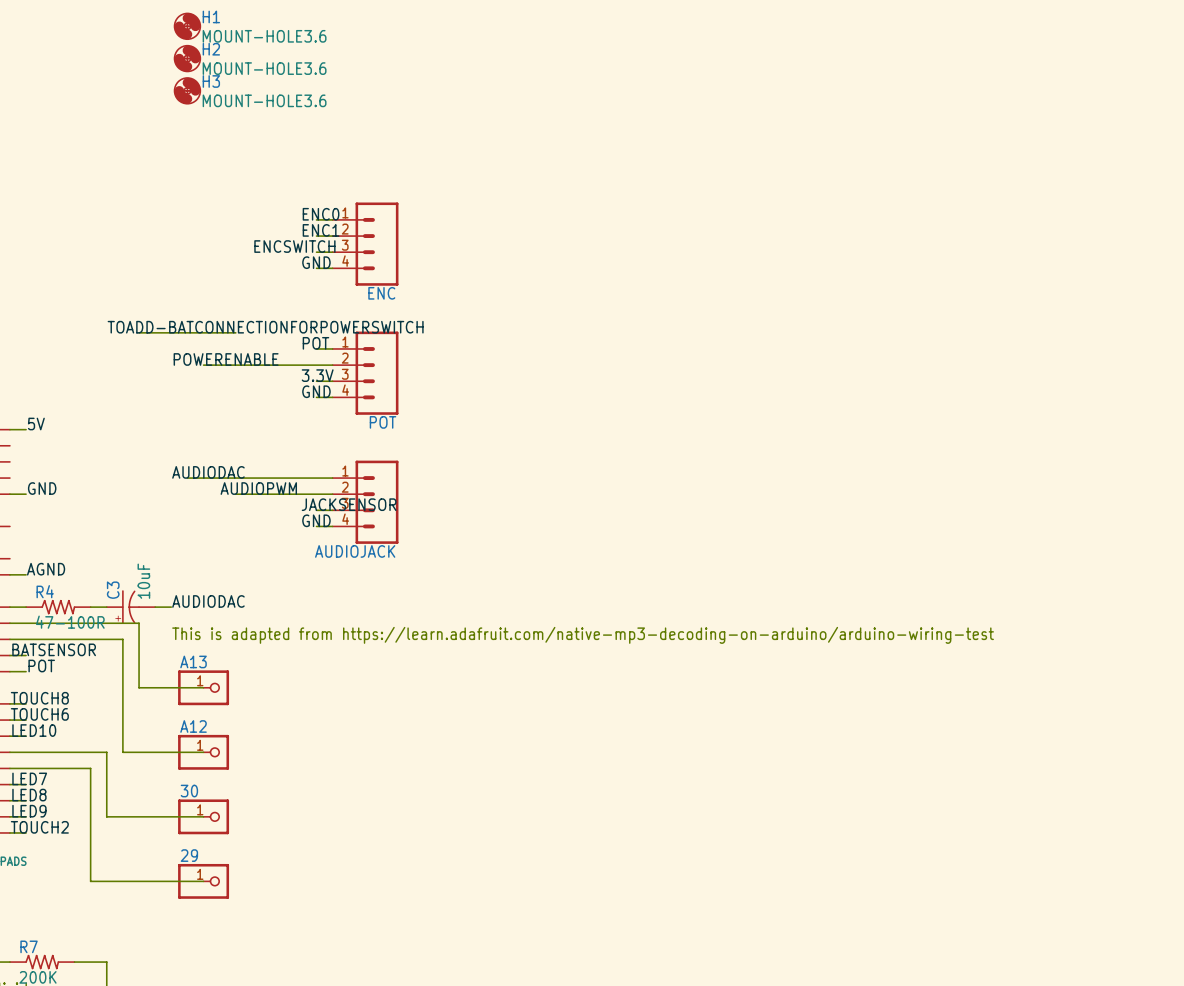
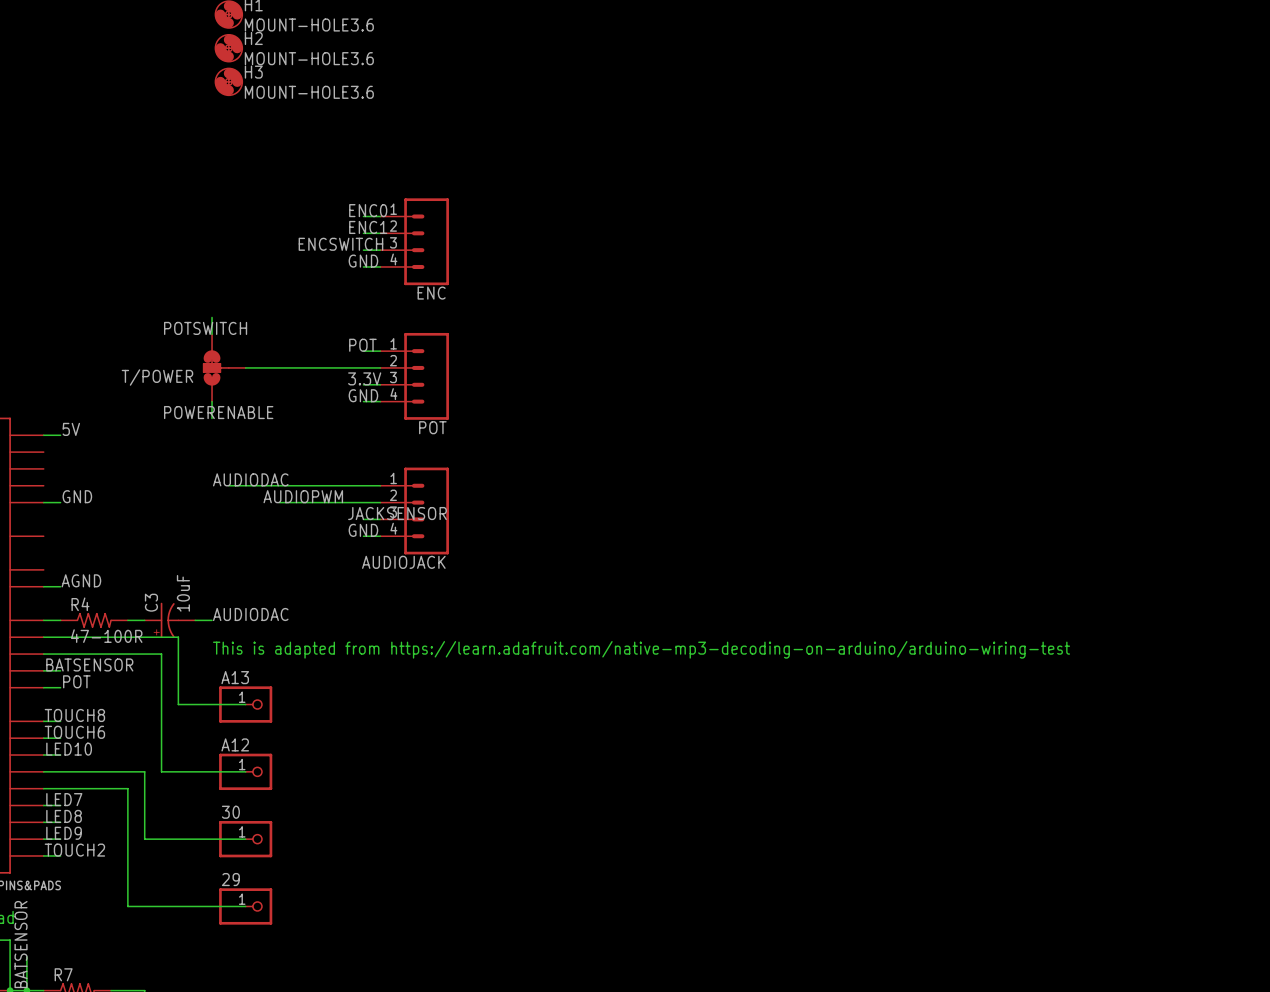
wire: none -> (212, 317) (212, 334)
label: none -> POTSWITCH (205, 328)
label: TOADD-BATCONNECTIONFORPOWERSWITCH (265, 327) -> none
wire: (139, 332) (235, 332) -> none
label position: POWERENABLE (226, 359) -> POWERENABLE (218, 412)
T/POWER: none -> (224, 367)
wire: none -> (212, 401) (212, 418)

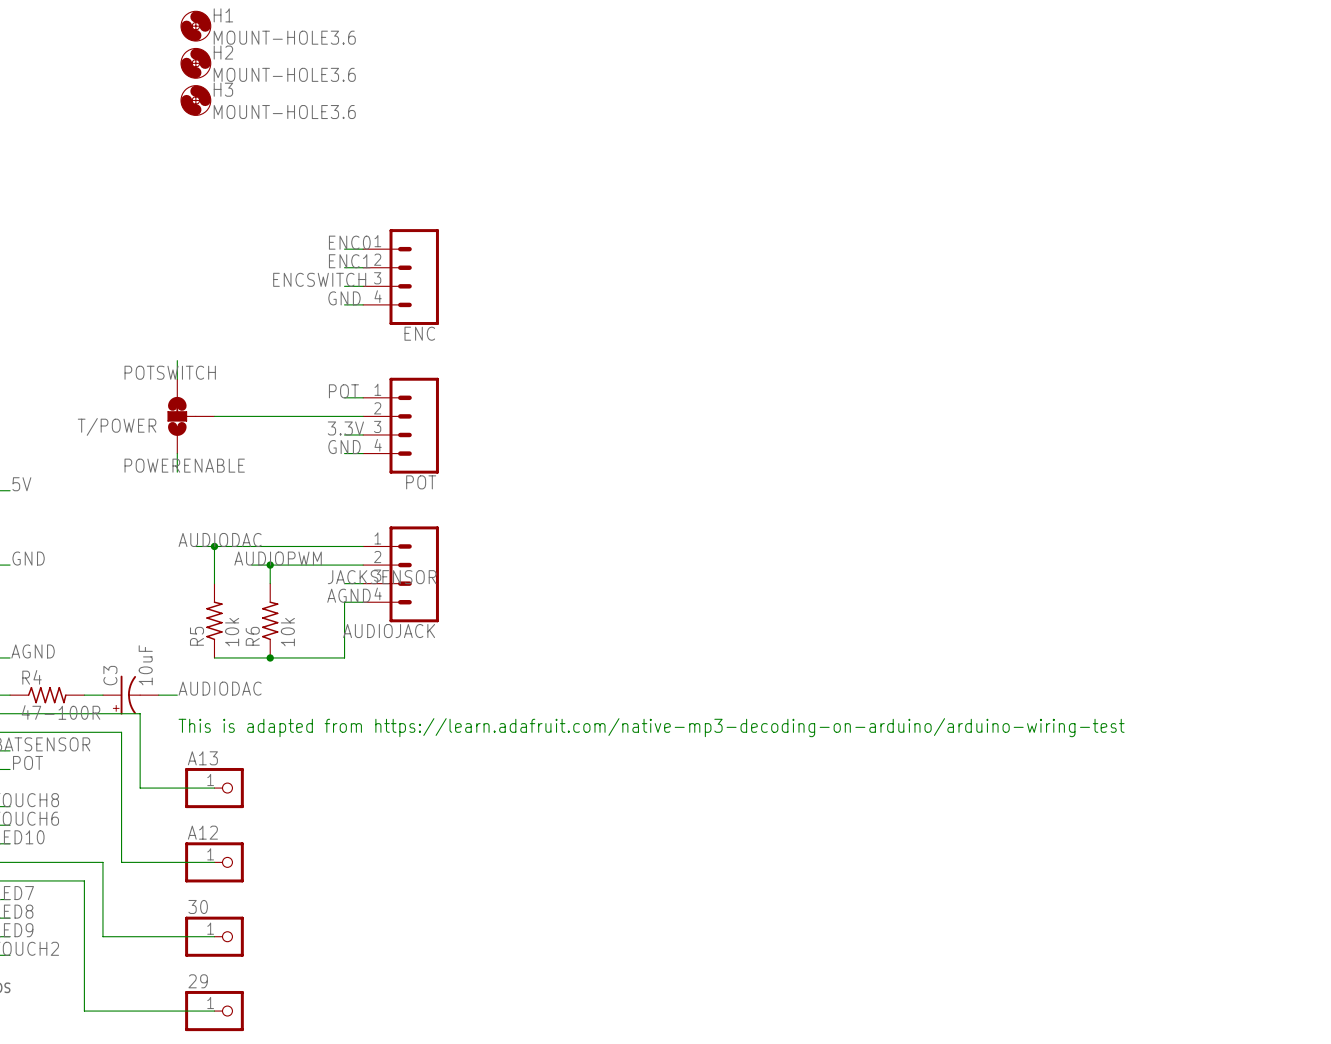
wire: none -> (214, 546) (214, 583)
junction: none -> (214, 546)
wire: none -> (270, 565) (270, 583)
junction: none -> (270, 565)
label: GND (363, 530) -> AGND (348, 595)
wire: none -> (344, 602) (344, 657) (214, 657)
R5: none -> 10k (214, 620)
R6: none -> 10k (270, 620)
junction: none -> (270, 657)

